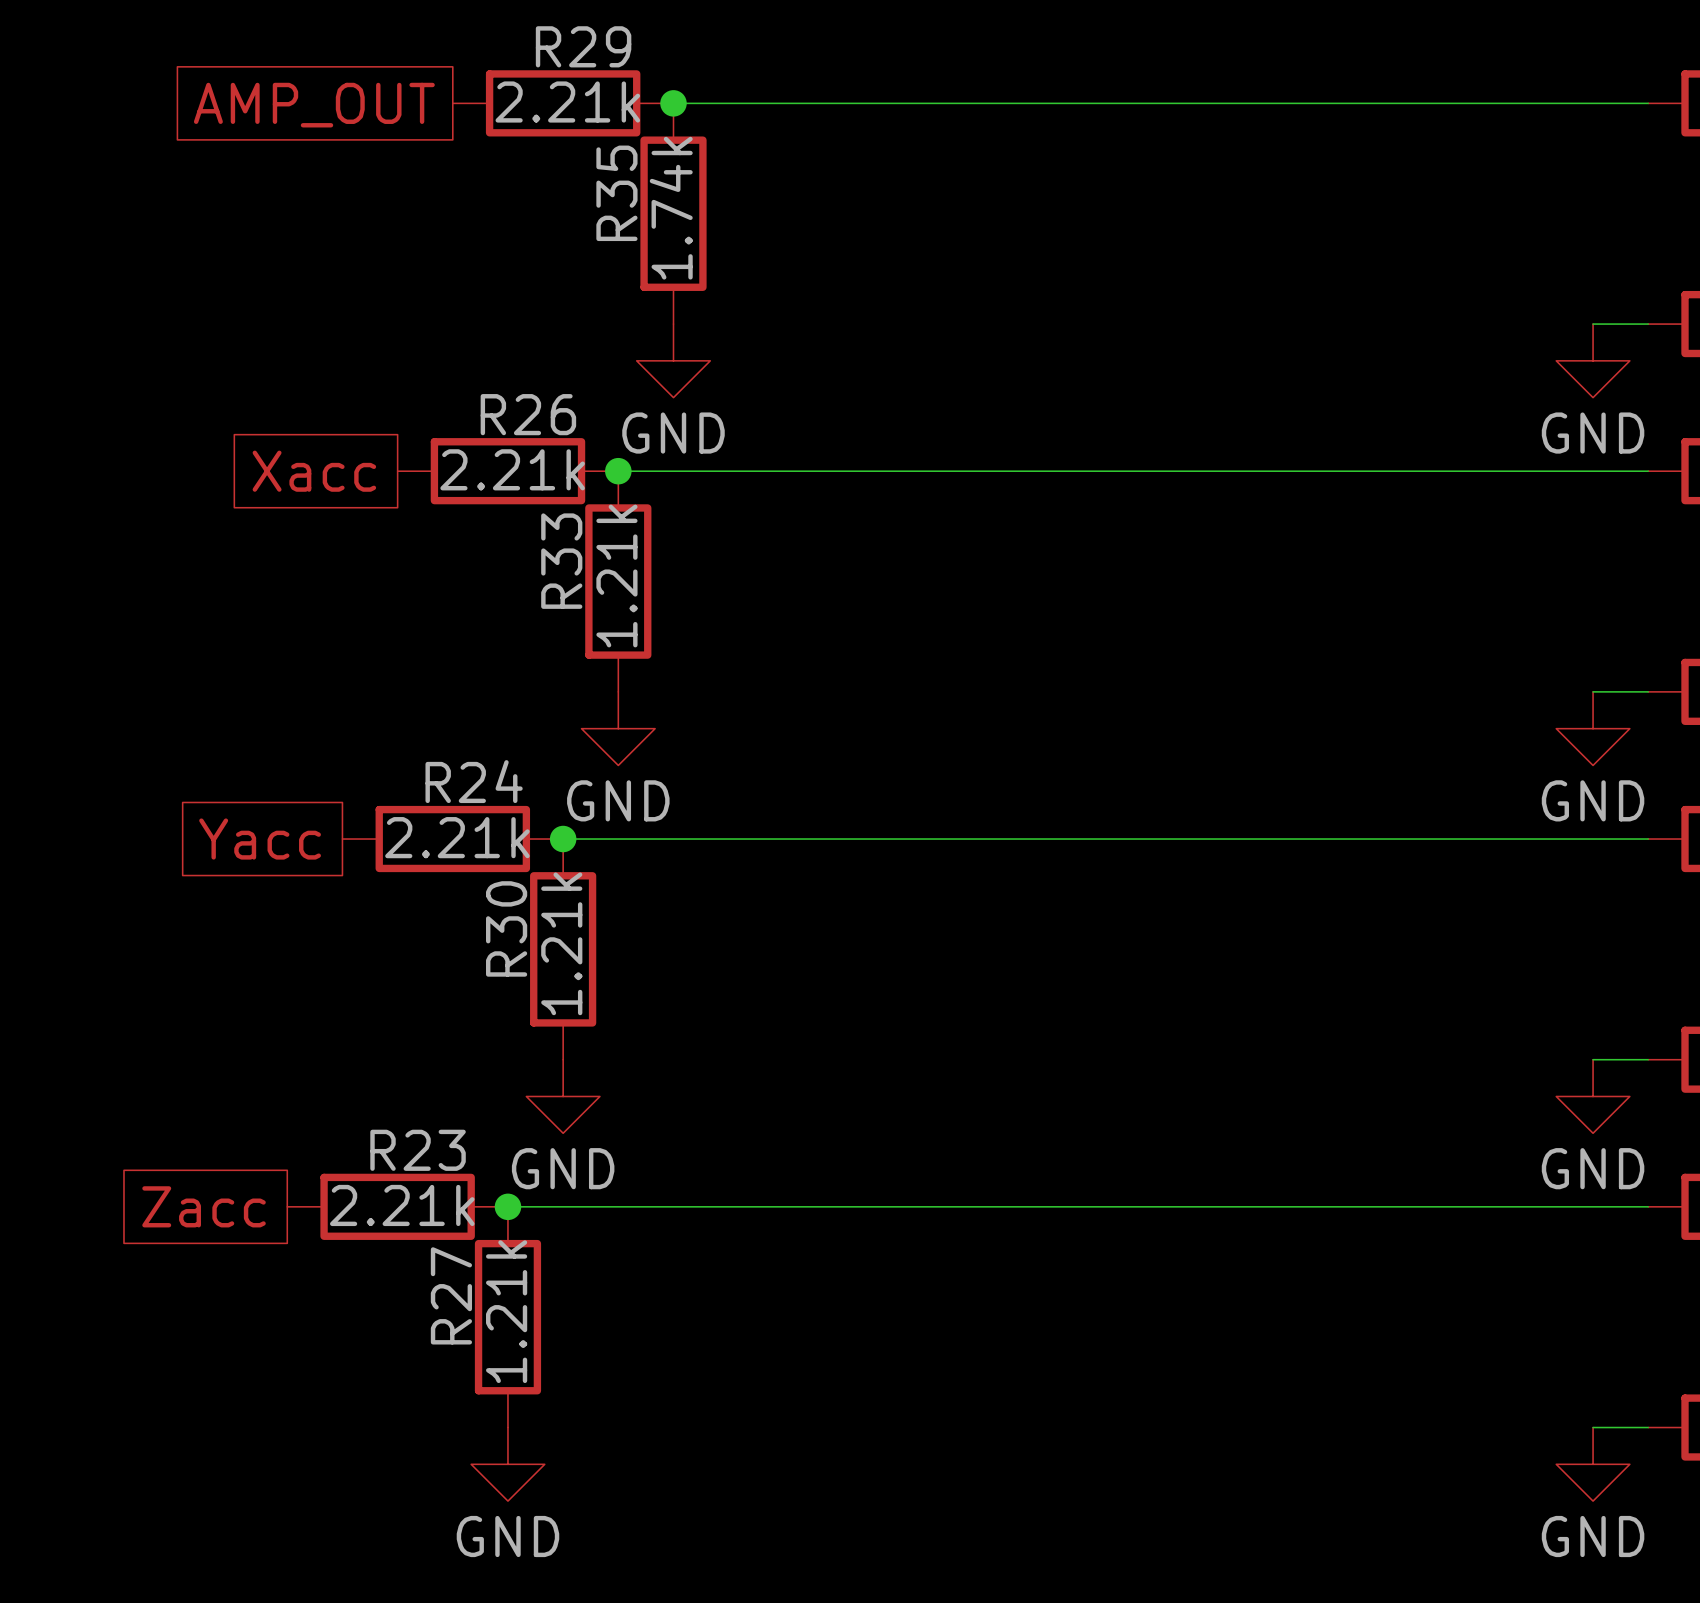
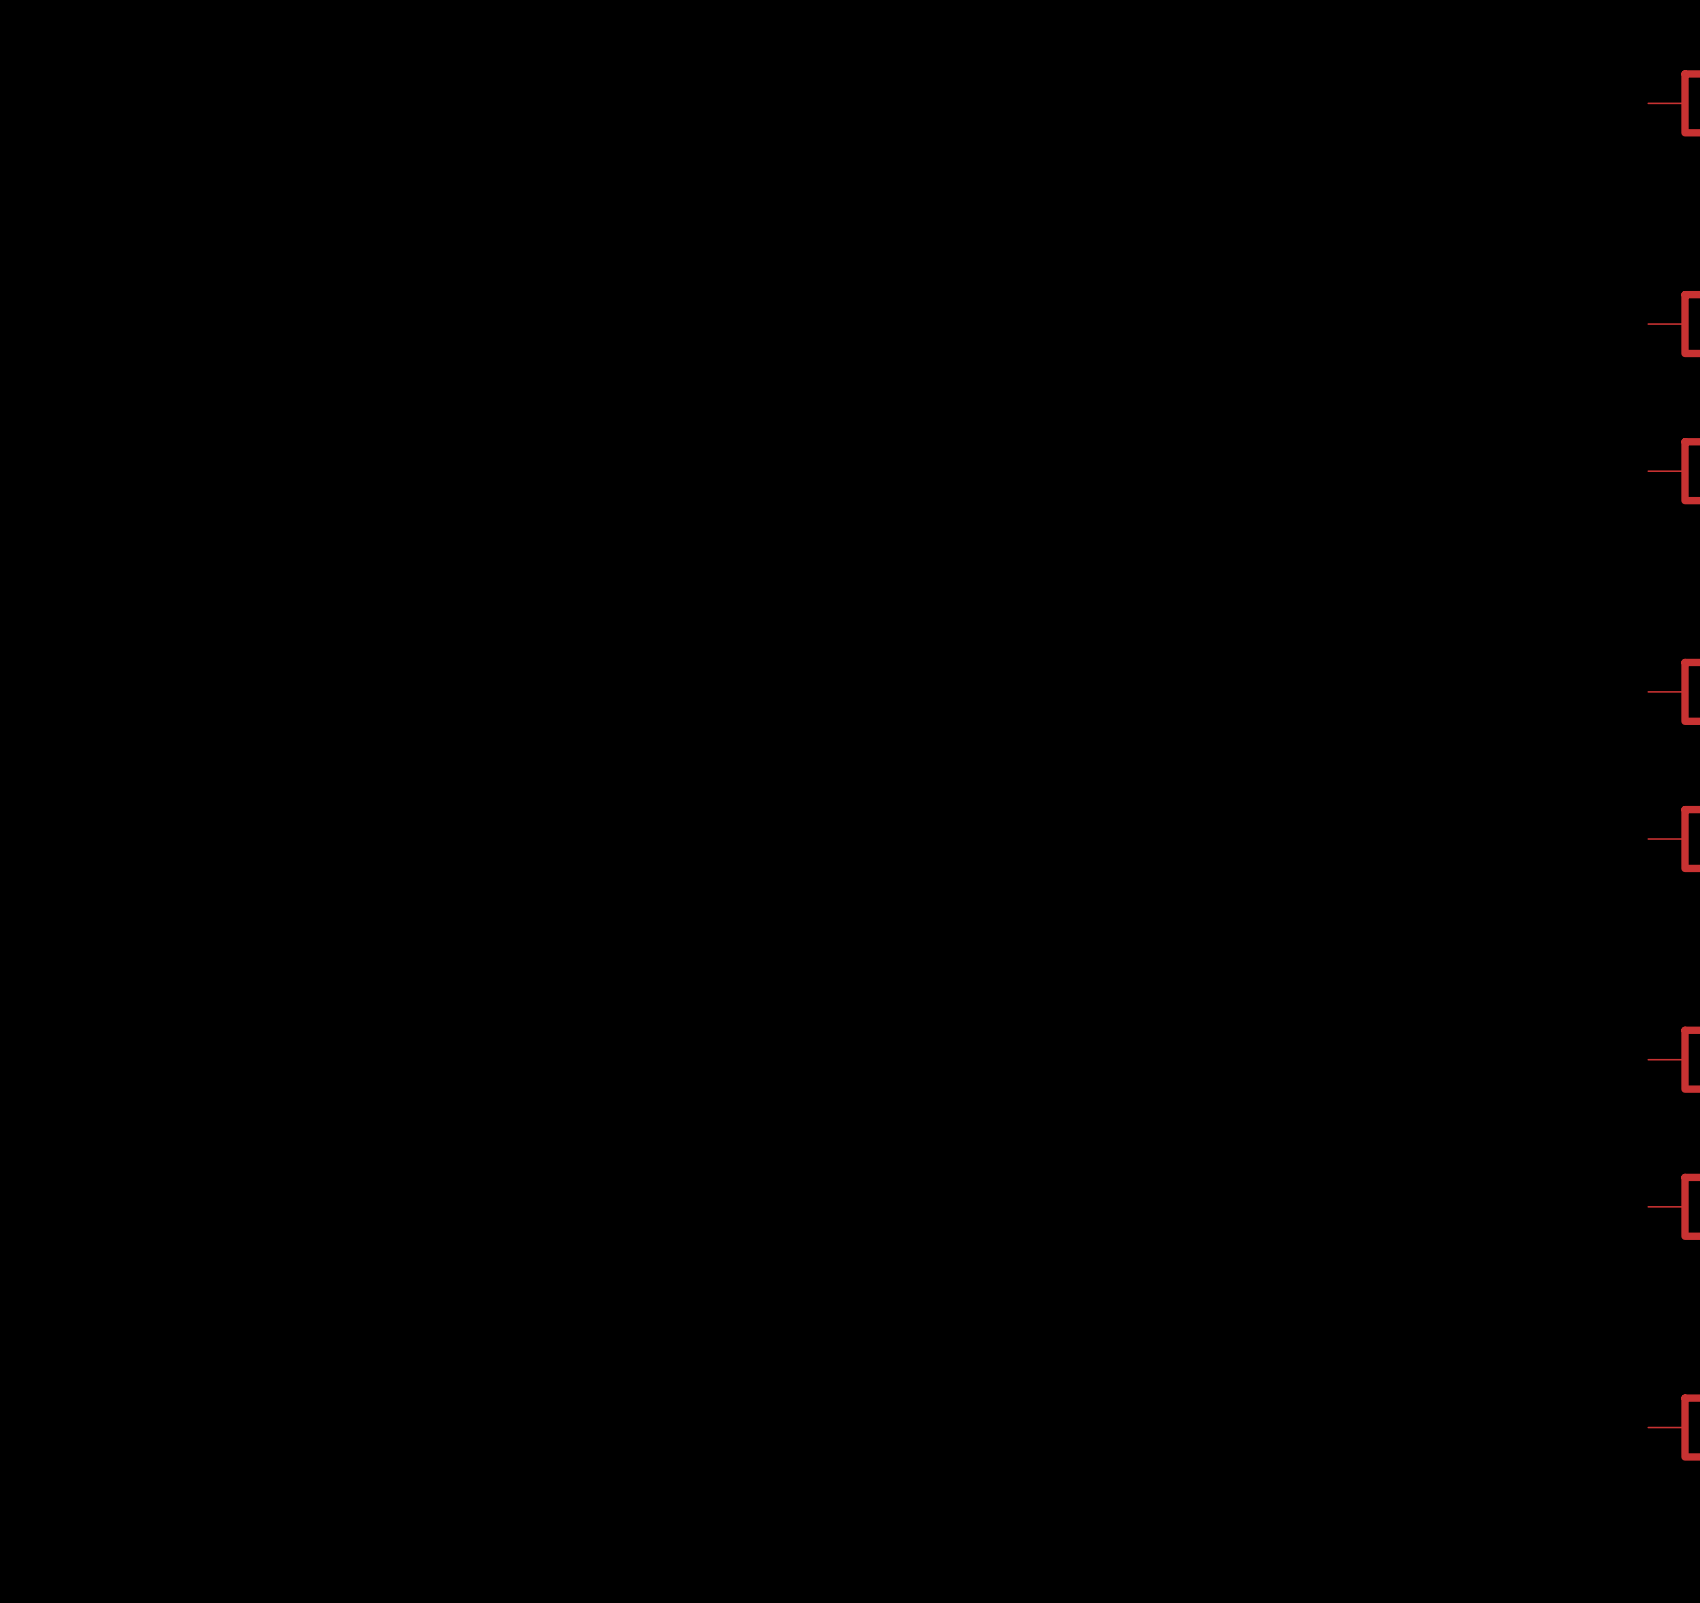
R29: (563, 103) -> none
wire: (673, 103) (1648, 103) -> none
junction: (673, 103) -> none
global label: AMP_OUT (314, 105) -> none
R35: (673, 213) -> none
wire: (1593, 324) (1648, 324) -> none
power symbol: GND (673, 360) -> none
power symbol: GND (1593, 360) -> none
global label: Xacc (314, 471) -> none
R26: (507, 471) -> none
wire: (618, 471) (1648, 471) -> none
junction: (618, 471) -> none
R33: (618, 581) -> none
wire: (1593, 691) (1648, 691) -> none
power symbol: GND (618, 728) -> none
power symbol: GND (1593, 728) -> none
global label: Yacc (260, 839) -> none
R24: (452, 839) -> none
wire: (563, 839) (1648, 839) -> none
junction: (563, 839) -> none
R30: (563, 949) -> none
wire: (1593, 1059) (1648, 1059) -> none
power symbol: GND (563, 1096) -> none
power symbol: GND (1593, 1096) -> none
global label: Zacc (204, 1206) -> none
R23: (397, 1206) -> none
wire: (507, 1206) (1648, 1206) -> none
junction: (507, 1206) -> none
R27: (507, 1317) -> none
wire: (1593, 1427) (1648, 1427) -> none
power symbol: GND (507, 1464) -> none
power symbol: GND (1593, 1464) -> none

